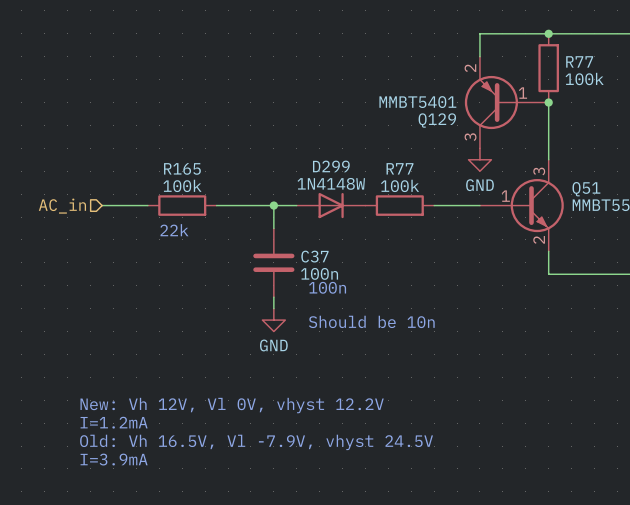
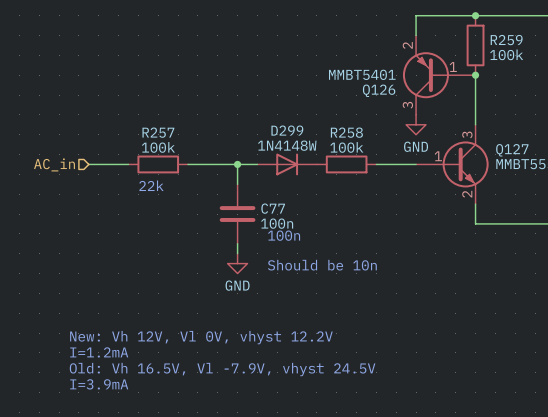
R77 name: R77 (579, 61) -> R259 (506, 40)
Q129 name: Q129 (437, 120) -> Q126 (379, 90)
R165 name: R165 (182, 168) -> R257 (158, 132)
R77 name: R77 (399, 168) -> R258 (346, 132)
Q51 name: Q51 (586, 189) -> Q127 (512, 150)
C37 name: C37 (314, 256) -> C77 (273, 208)

